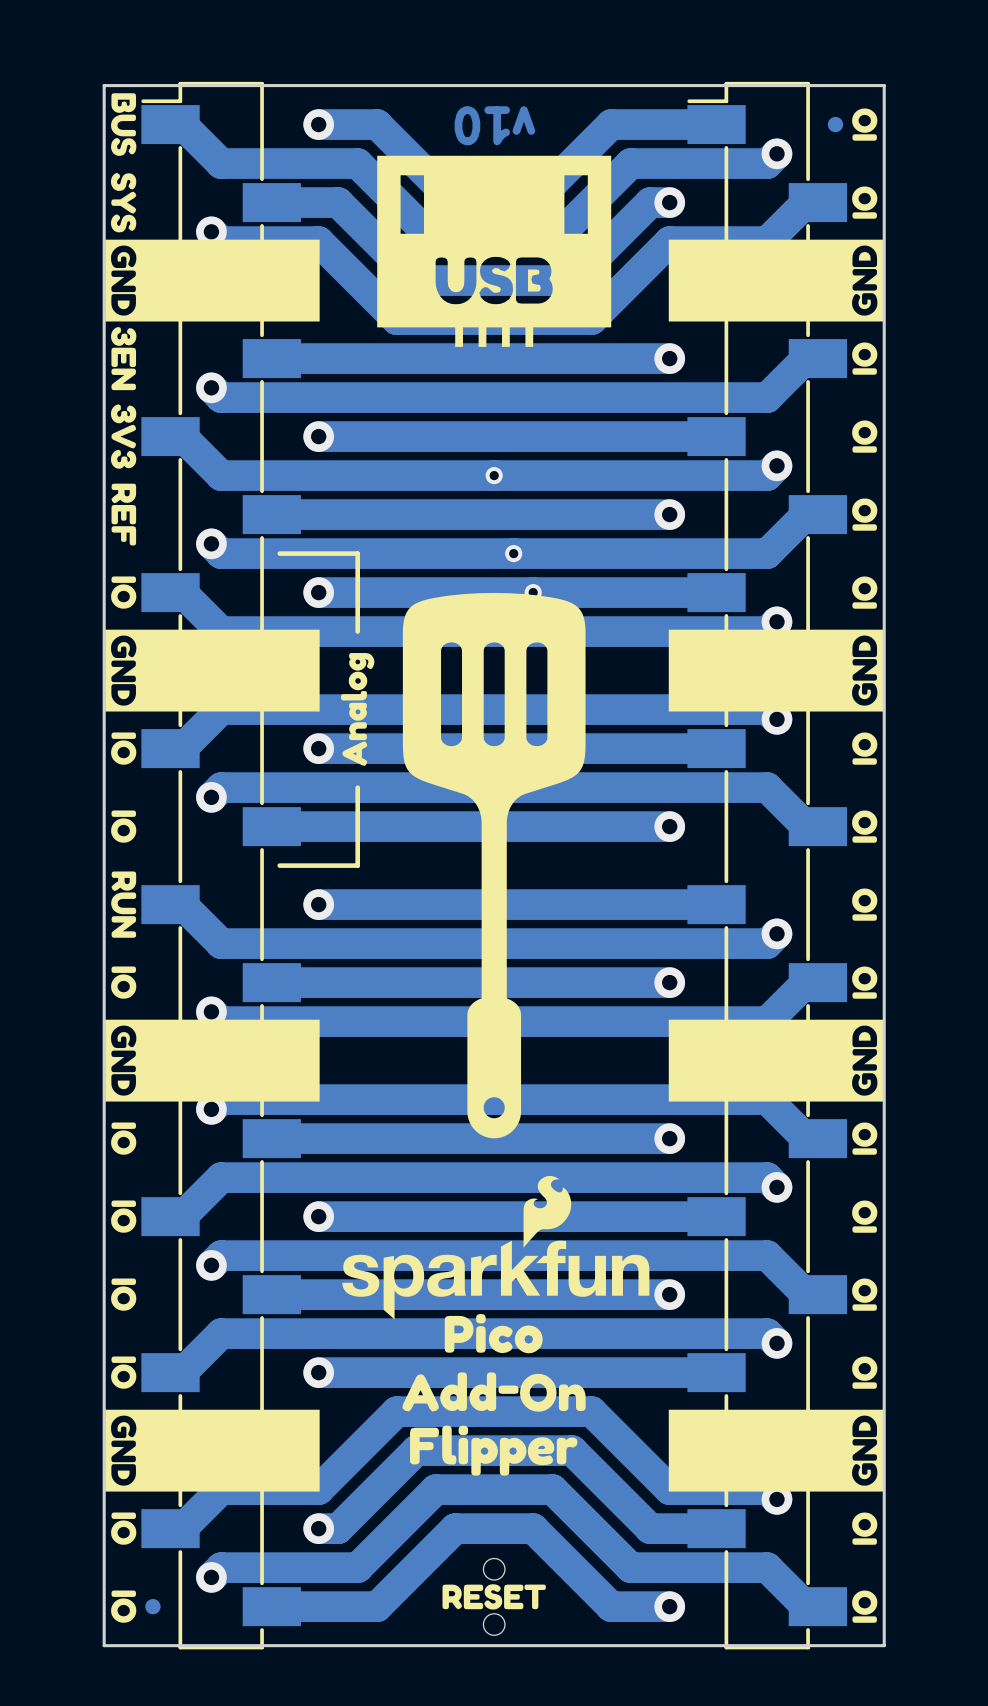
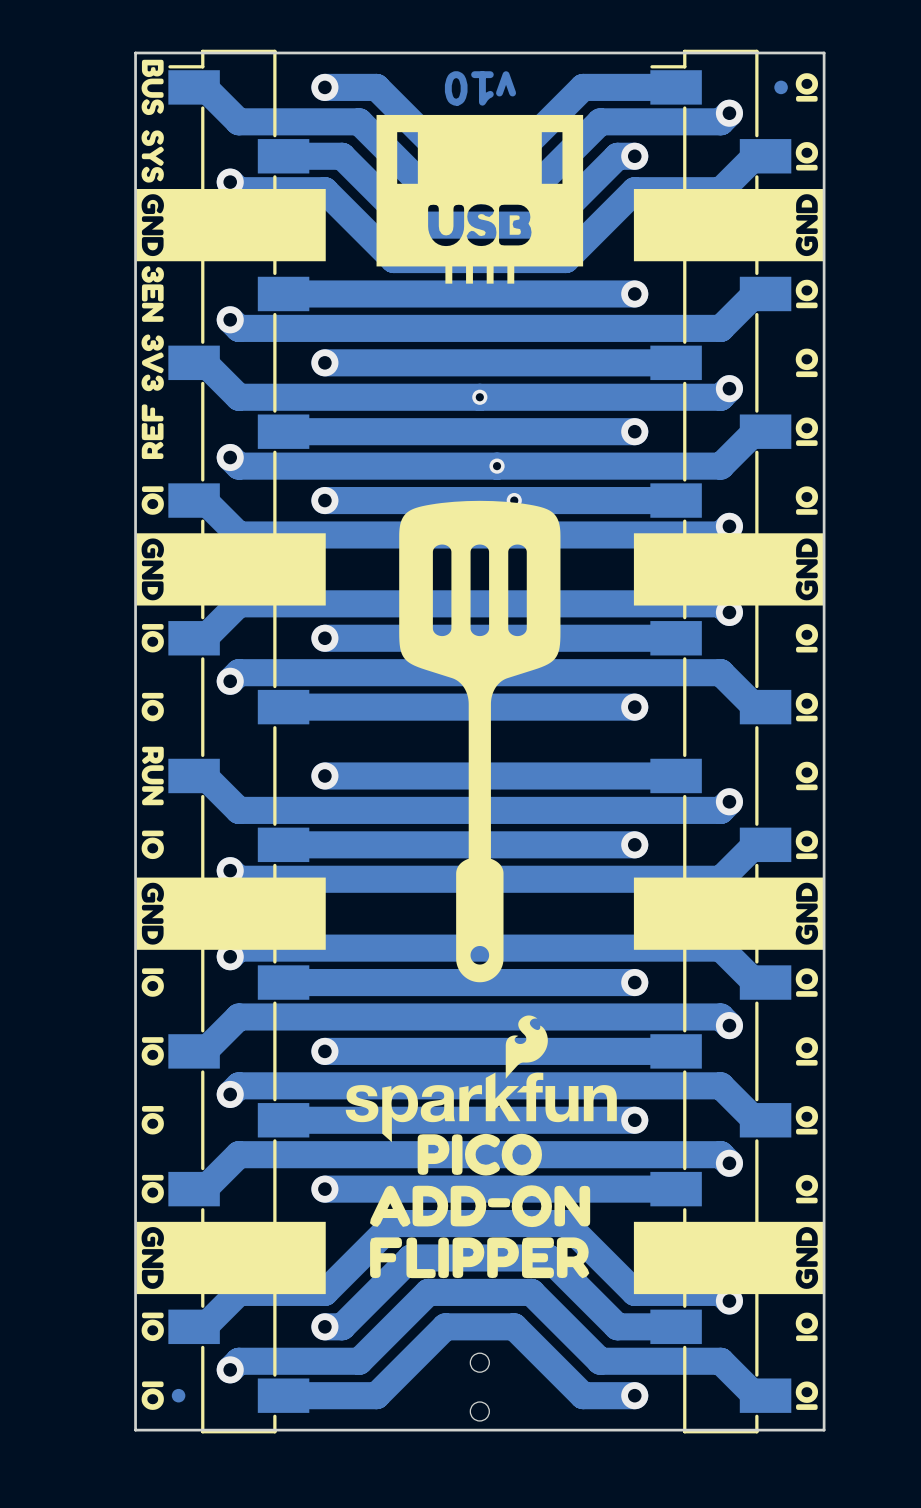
drawing shape: [111, 483, 137, 546] -> [141, 404, 164, 460]
line: (279, 553) (357, 553) (357, 631) -> none
drawing: [341, 653, 375, 766] -> none
line: (357, 787) (357, 865) (279, 865) -> none
drawing shape: [444, 1313, 543, 1354] -> [417, 1133, 542, 1176]
drawing shape: [402, 1372, 586, 1412] -> [370, 1185, 591, 1228]
drawing shape: [410, 1425, 578, 1476] -> [370, 1237, 590, 1279]
drawing: [442, 1584, 546, 1610] -> none

